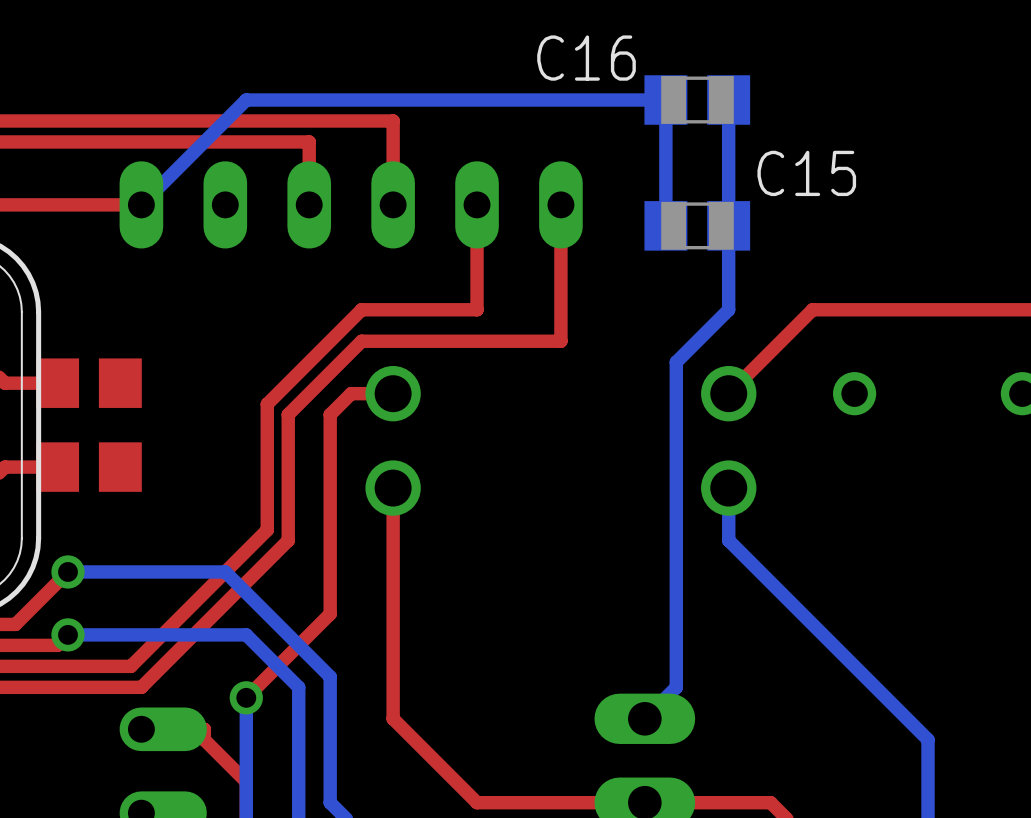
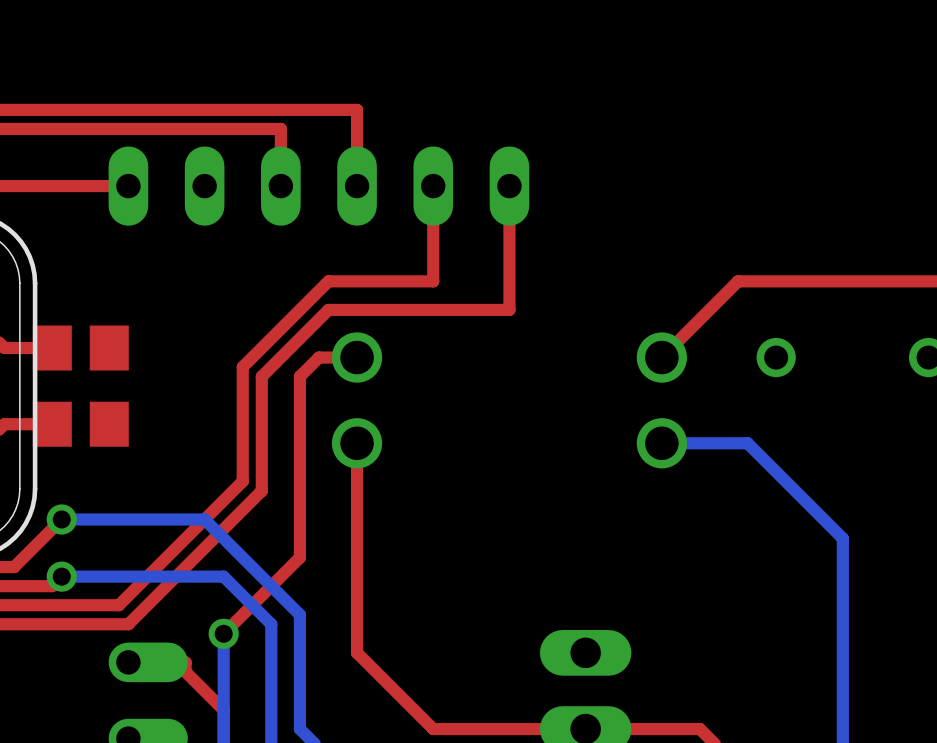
C16: (697, 100) -> none
bottom track: (728, 100) (728, 309) (676, 362) (676, 687) (644, 718) -> none
bottom track: (141, 204) (246, 100) (665, 100) (665, 225) -> none
C15: (697, 225) -> none
bottom track: (728, 488) (728, 540) (928, 739) -> (661, 443) (747, 443) (842, 538) (842, 671)

